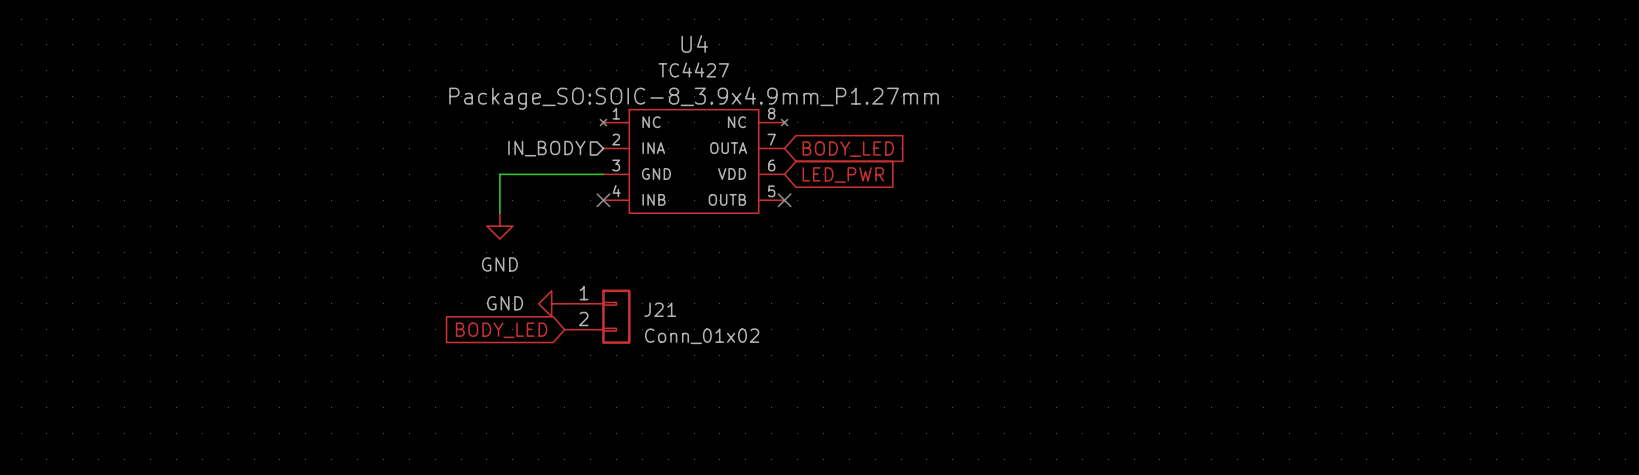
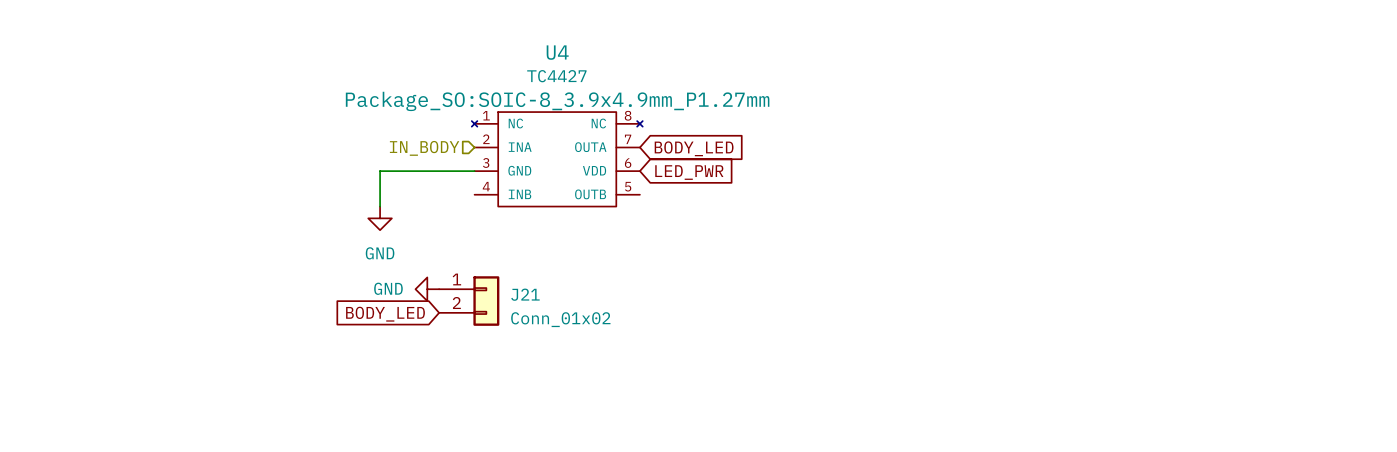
no-connect mark: (603, 200) -> none
no-connect mark: (784, 200) -> none

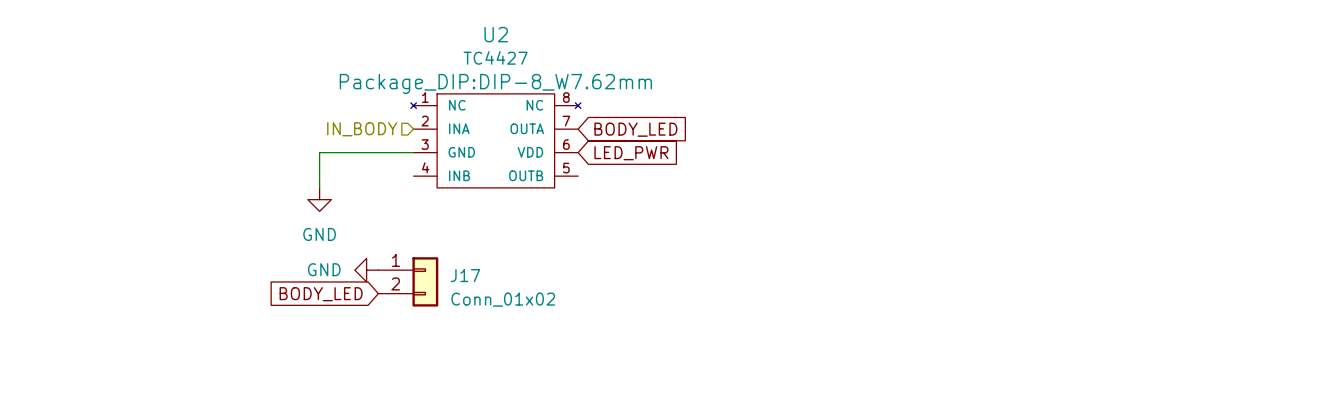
U4 name: U4 (557, 52) -> U2 (496, 34)
U4 text: Package_SO:SOIC-8_3.9x4.9mm_P1.27mm (557, 101) -> Package_DIP:DIP-8_W7.62mm (495, 83)
J21 name: J21 (525, 294) -> J17 (465, 275)

